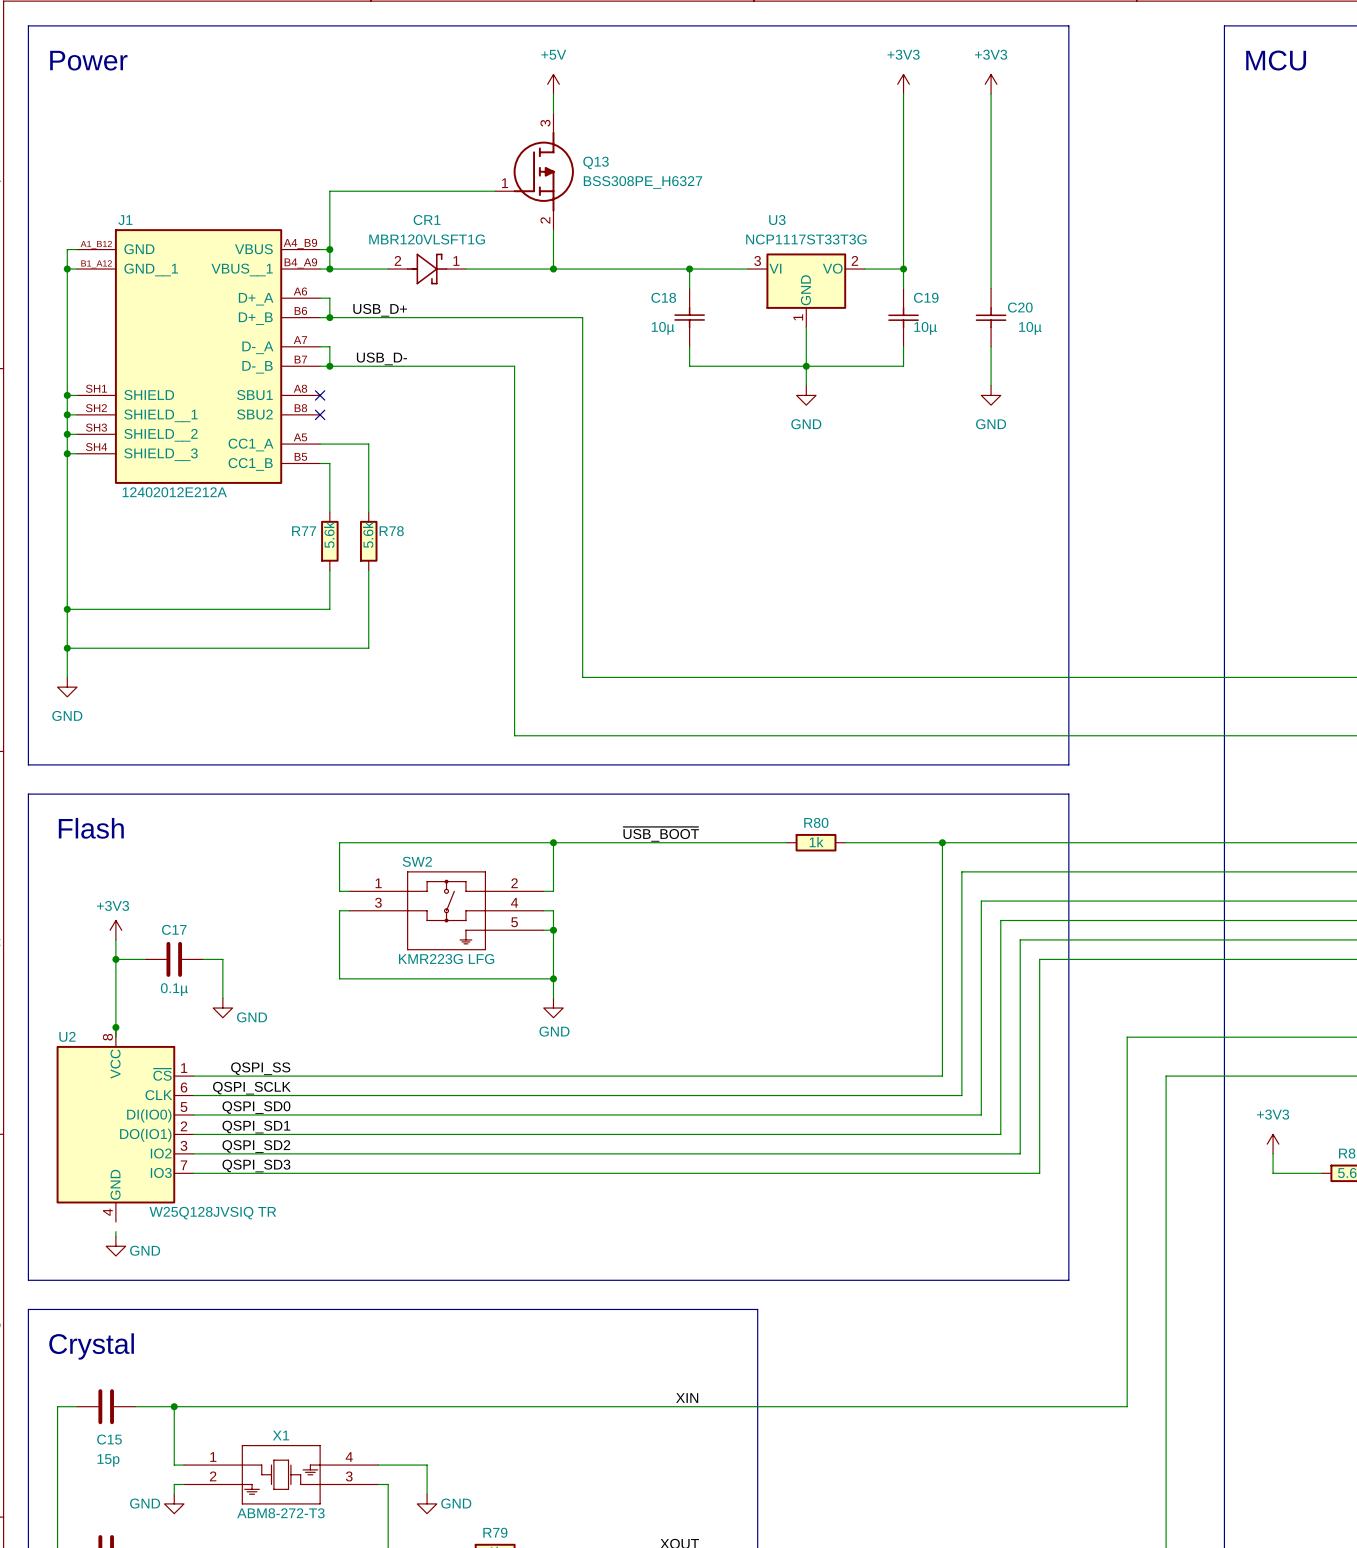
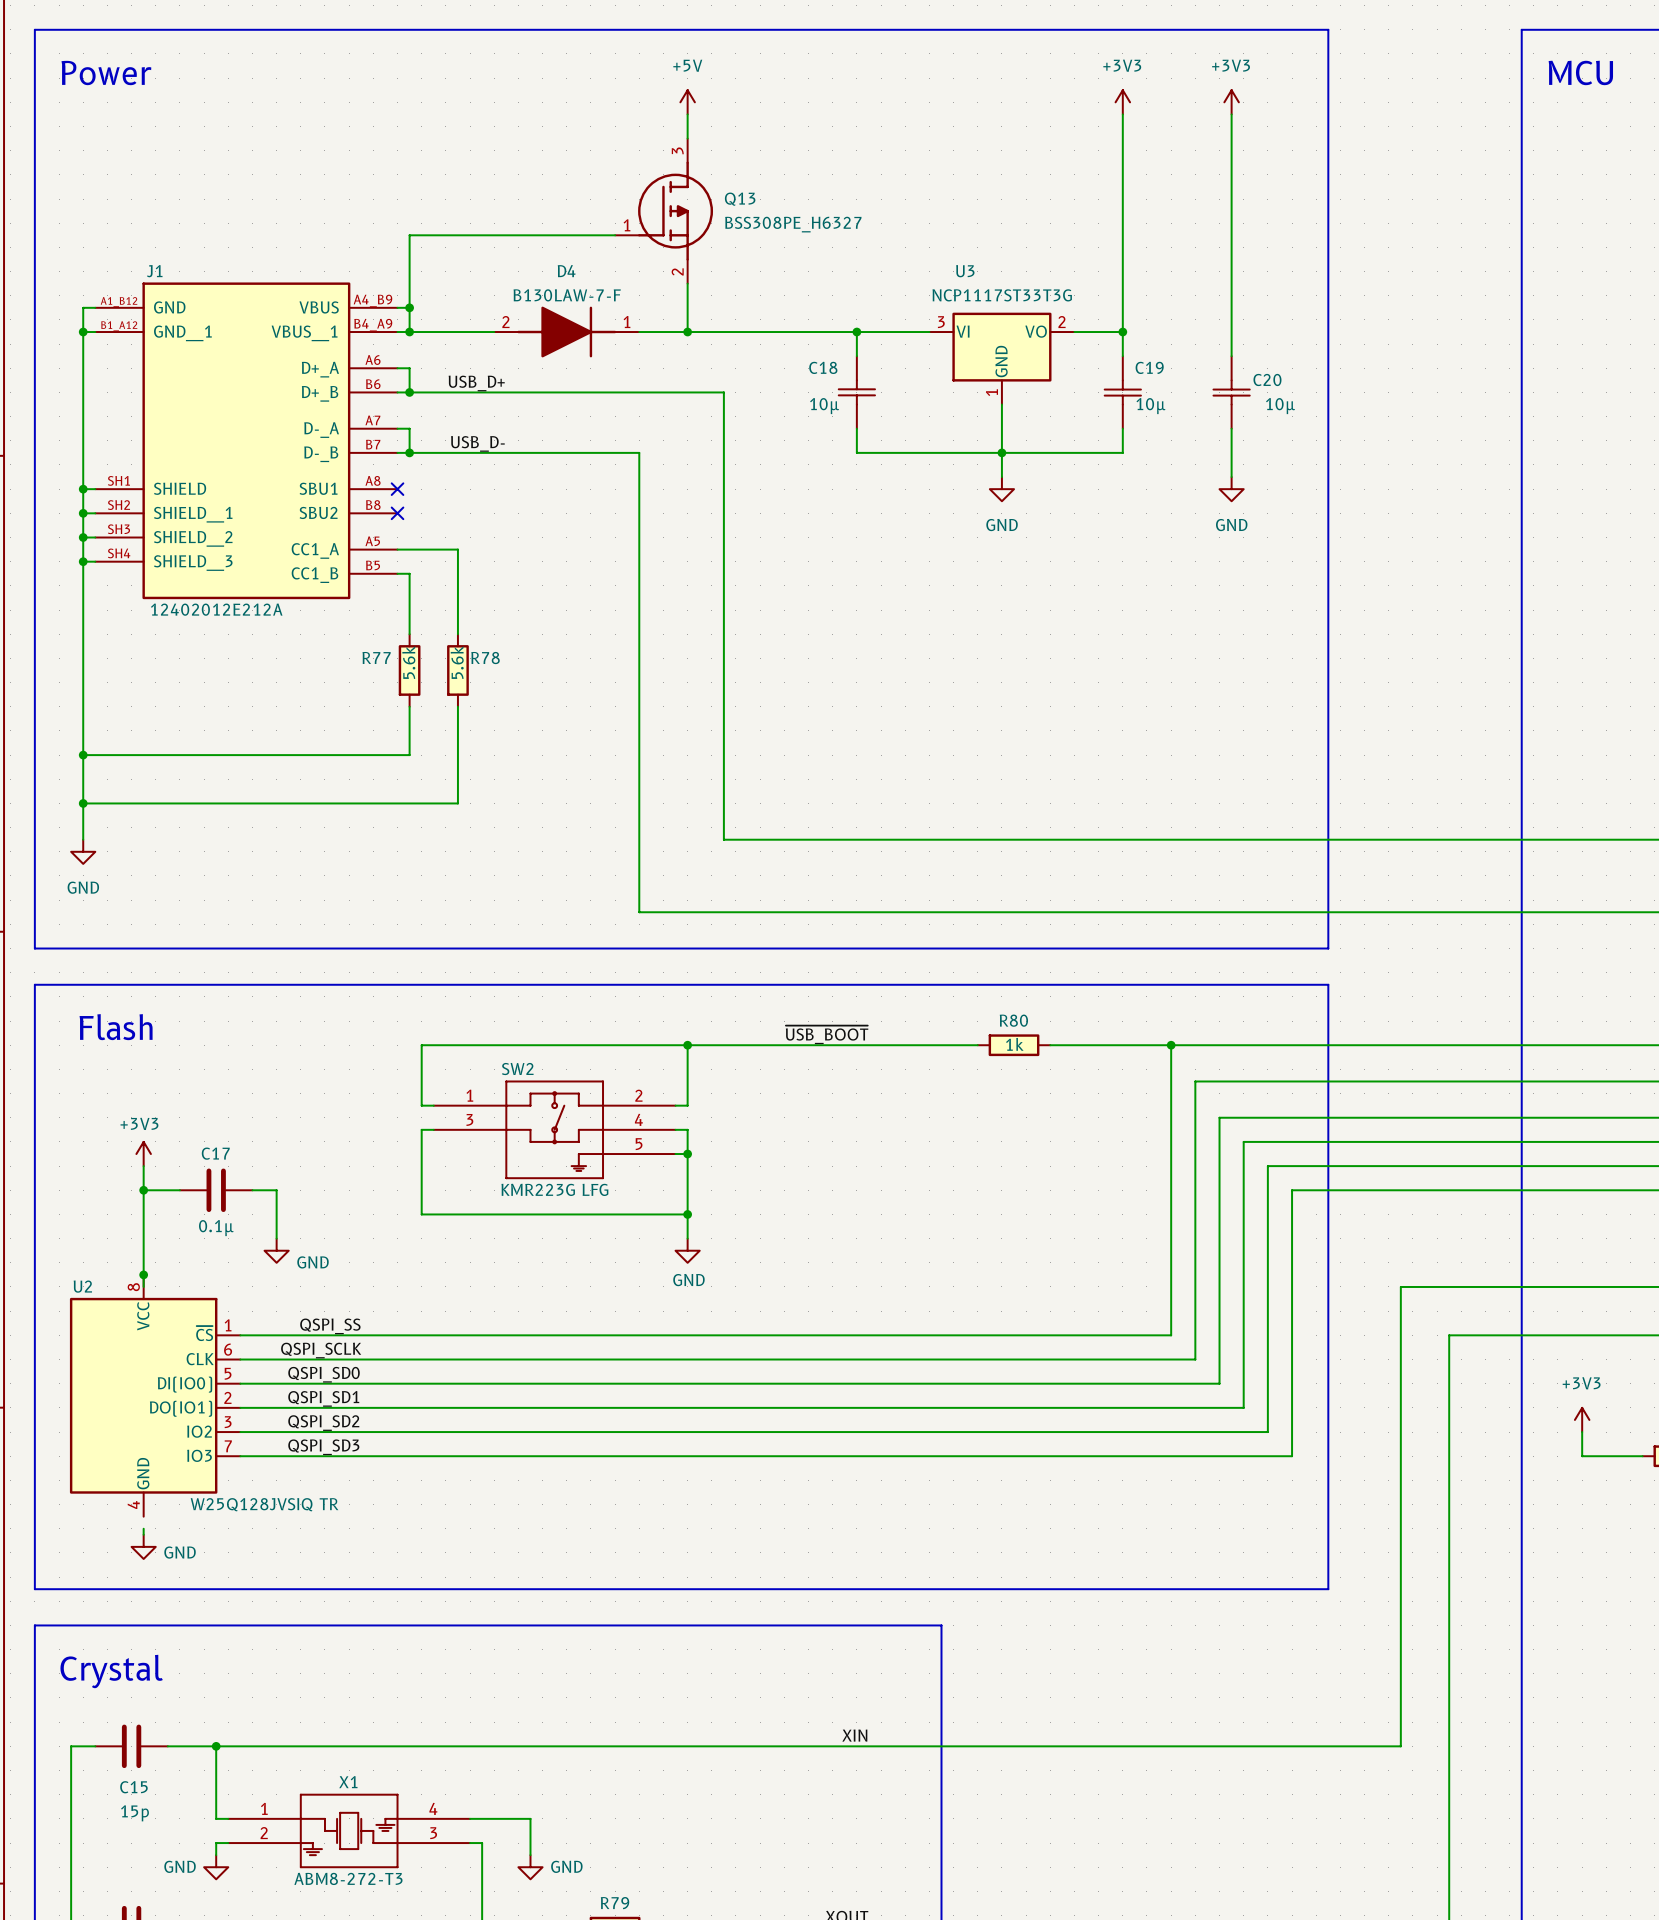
CR1: MBR120VLSFT1G (427, 269) -> none
D4: none -> B130LAW-7-F (566, 332)

